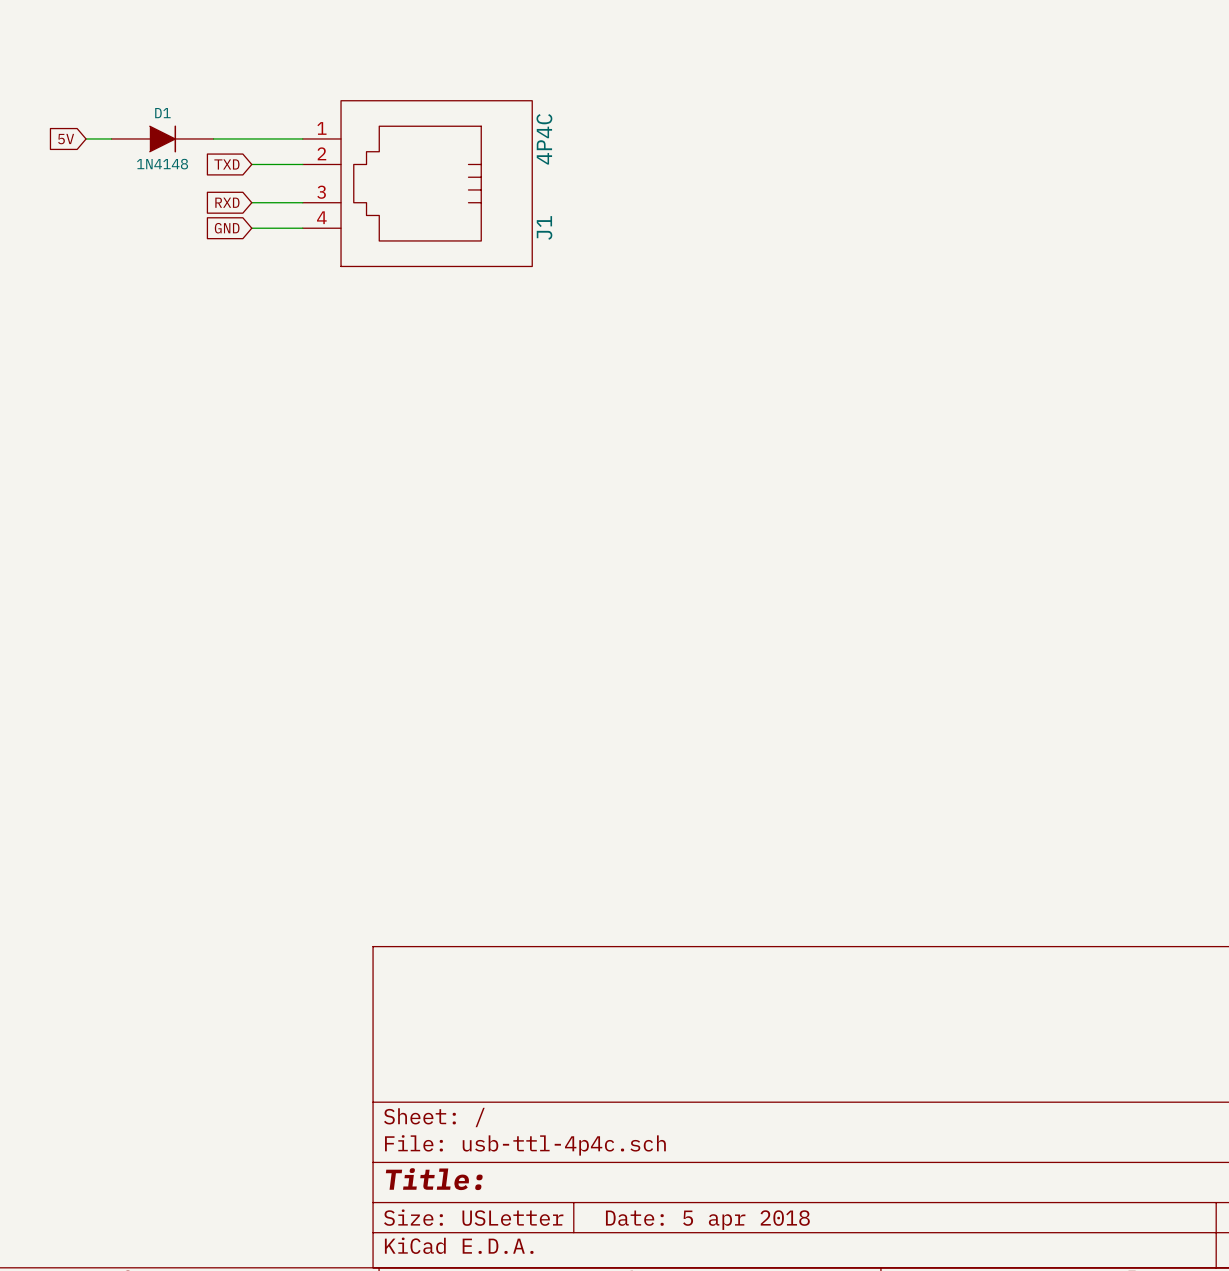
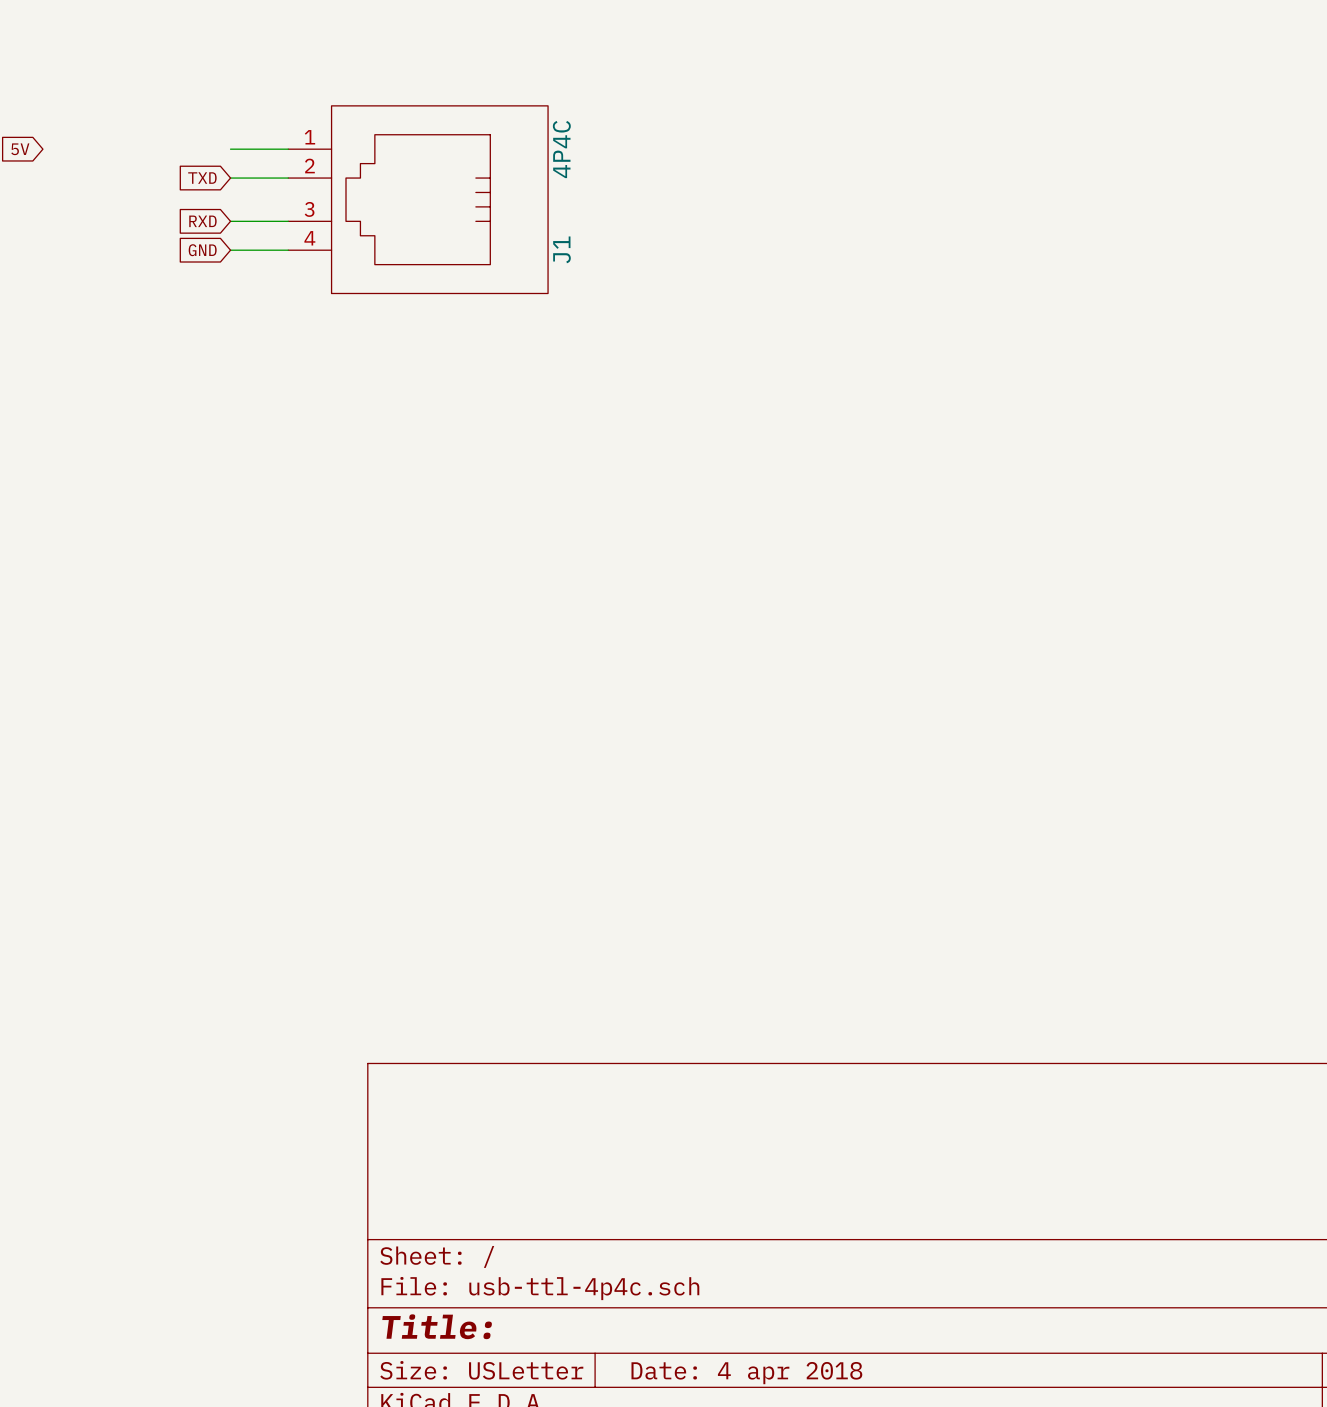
wire: (86, 138) (111, 138) -> none
D1: 1N4148 (162, 138) -> none
wire: (213, 138) (251, 138) -> none
title block: Date: 5 apr 2018 (707, 1220) -> Date: 4 apr 2018 (746, 1373)

